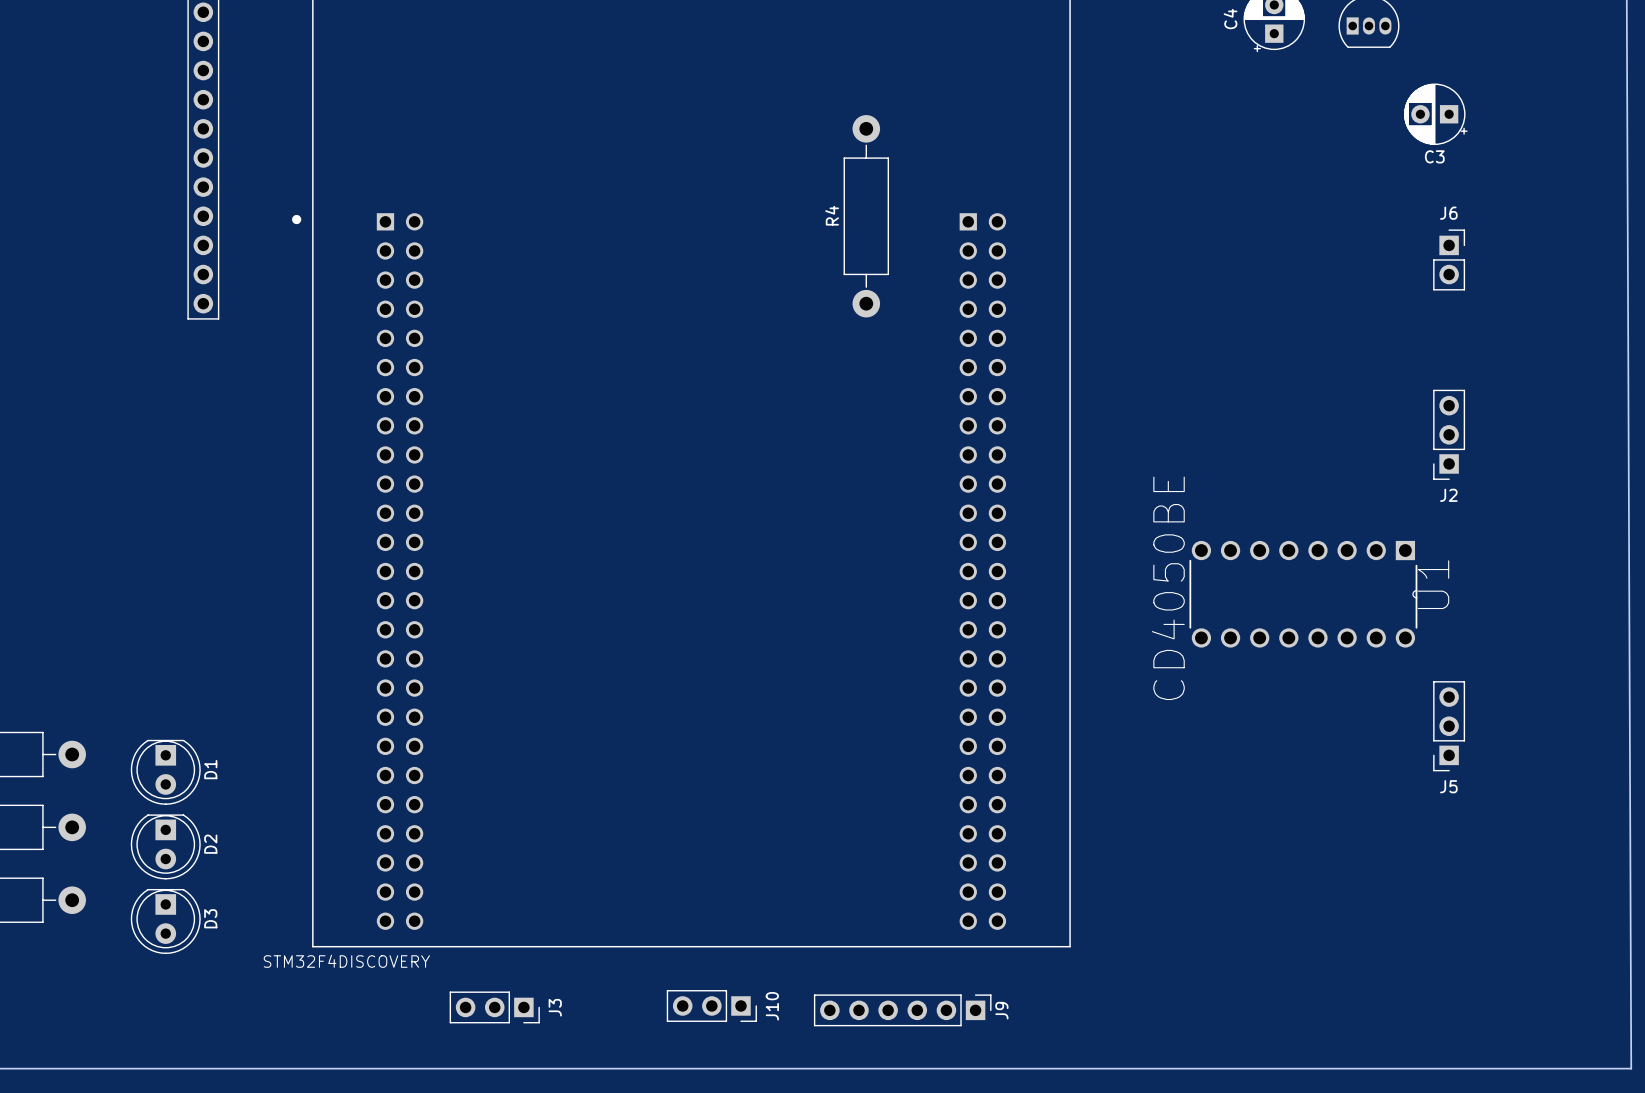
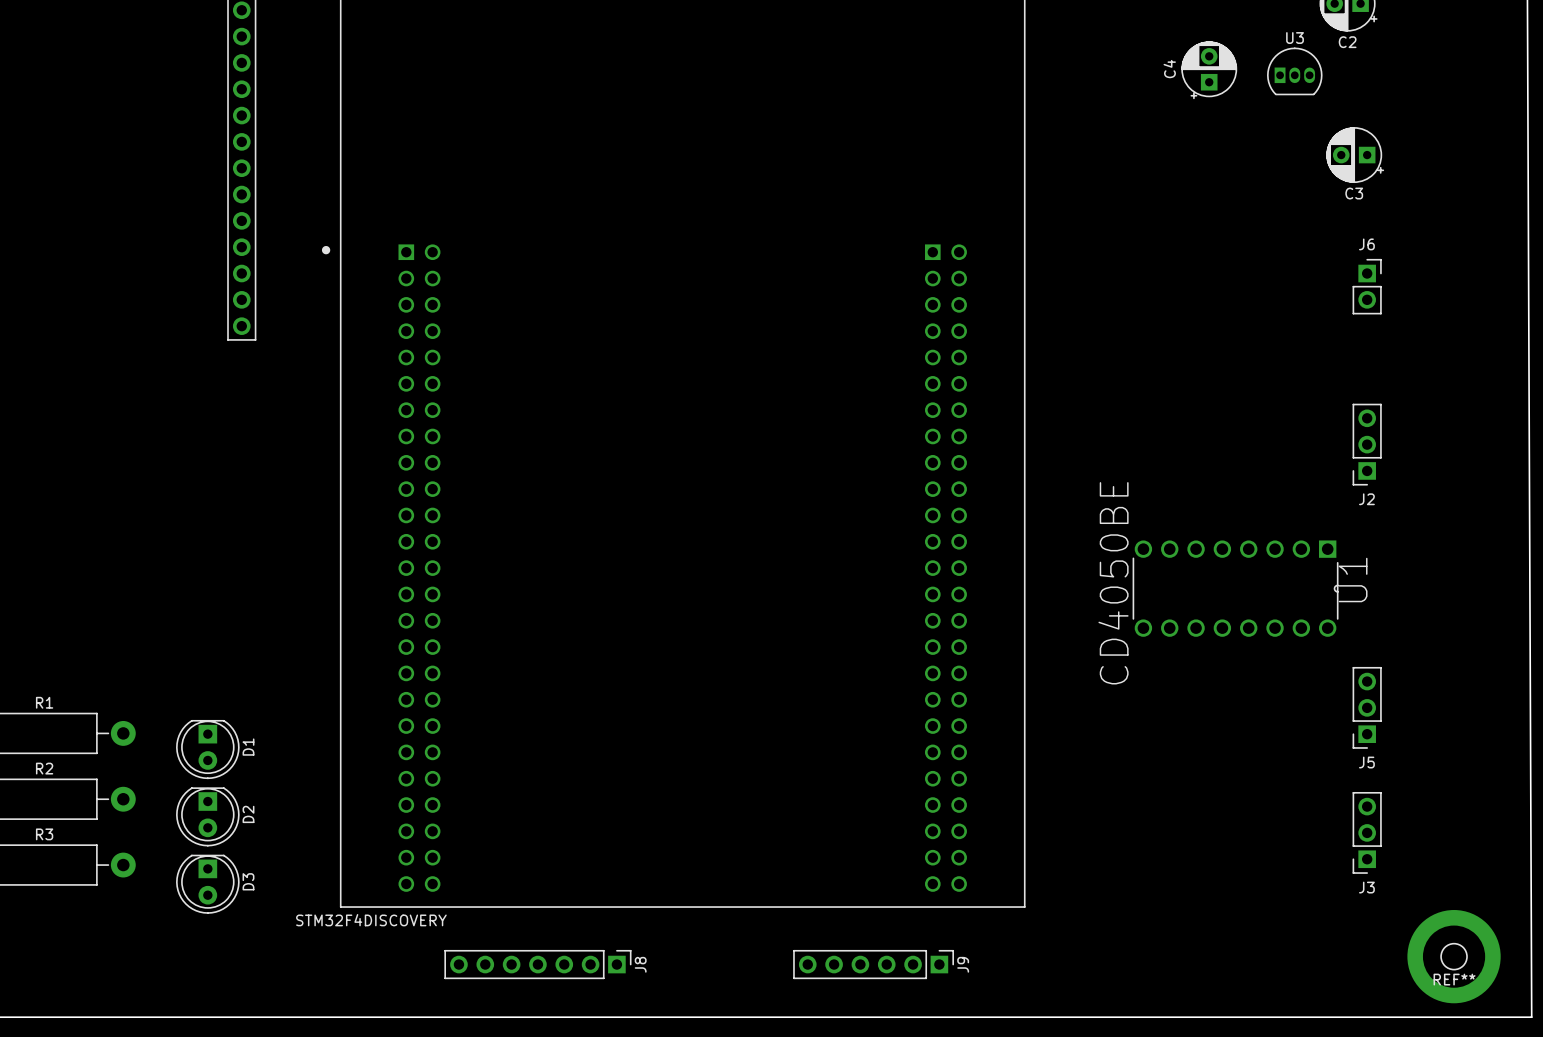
R4: (866, 216) -> none
REF**: none -> (1454, 956)
J10: (711, 1005) -> none
J3 rotation: 0° (494, 1007) -> 90° clockwise (1367, 832)
J3 position: (494, 1007) -> (1367, 832)
J8: none -> (537, 964)

